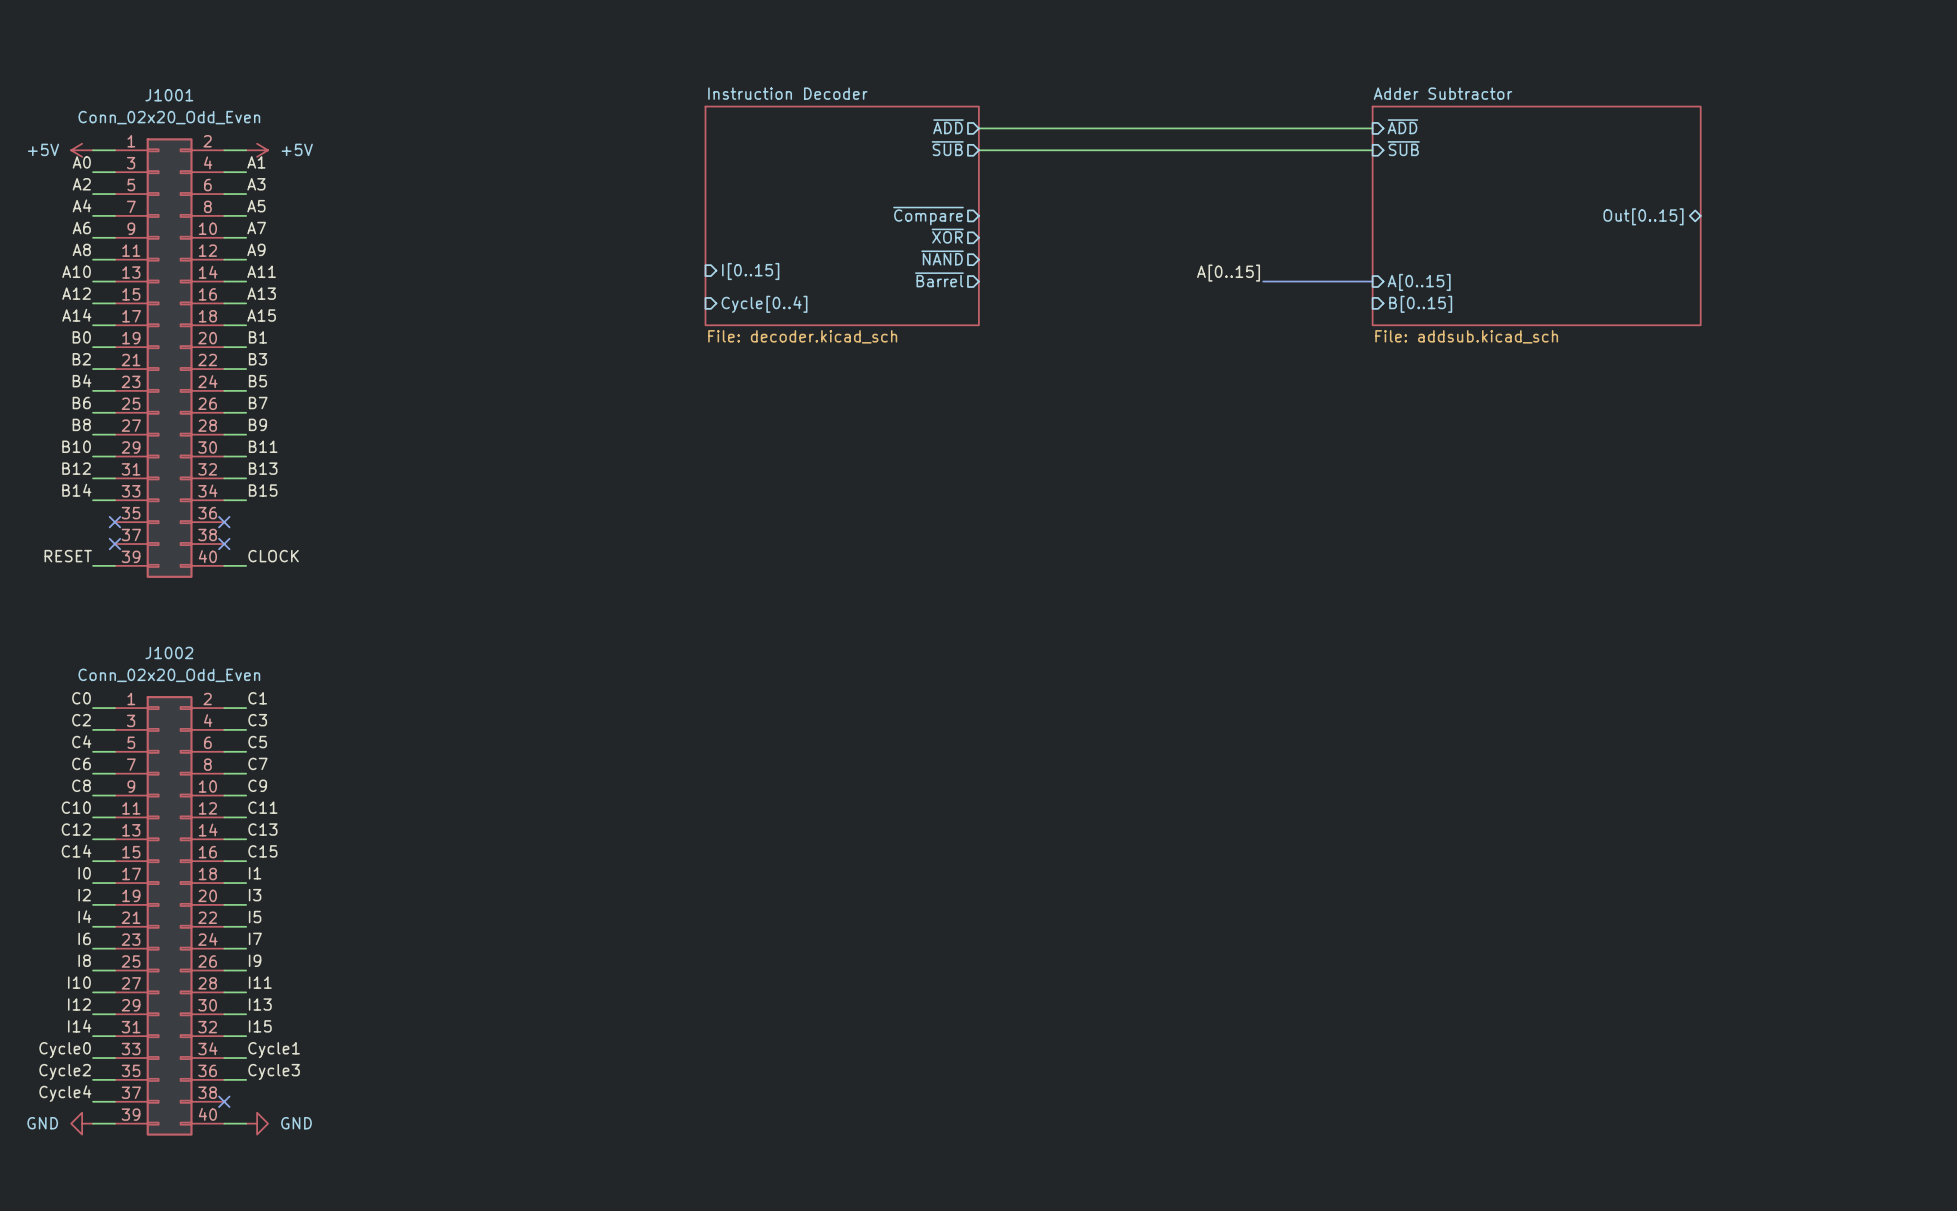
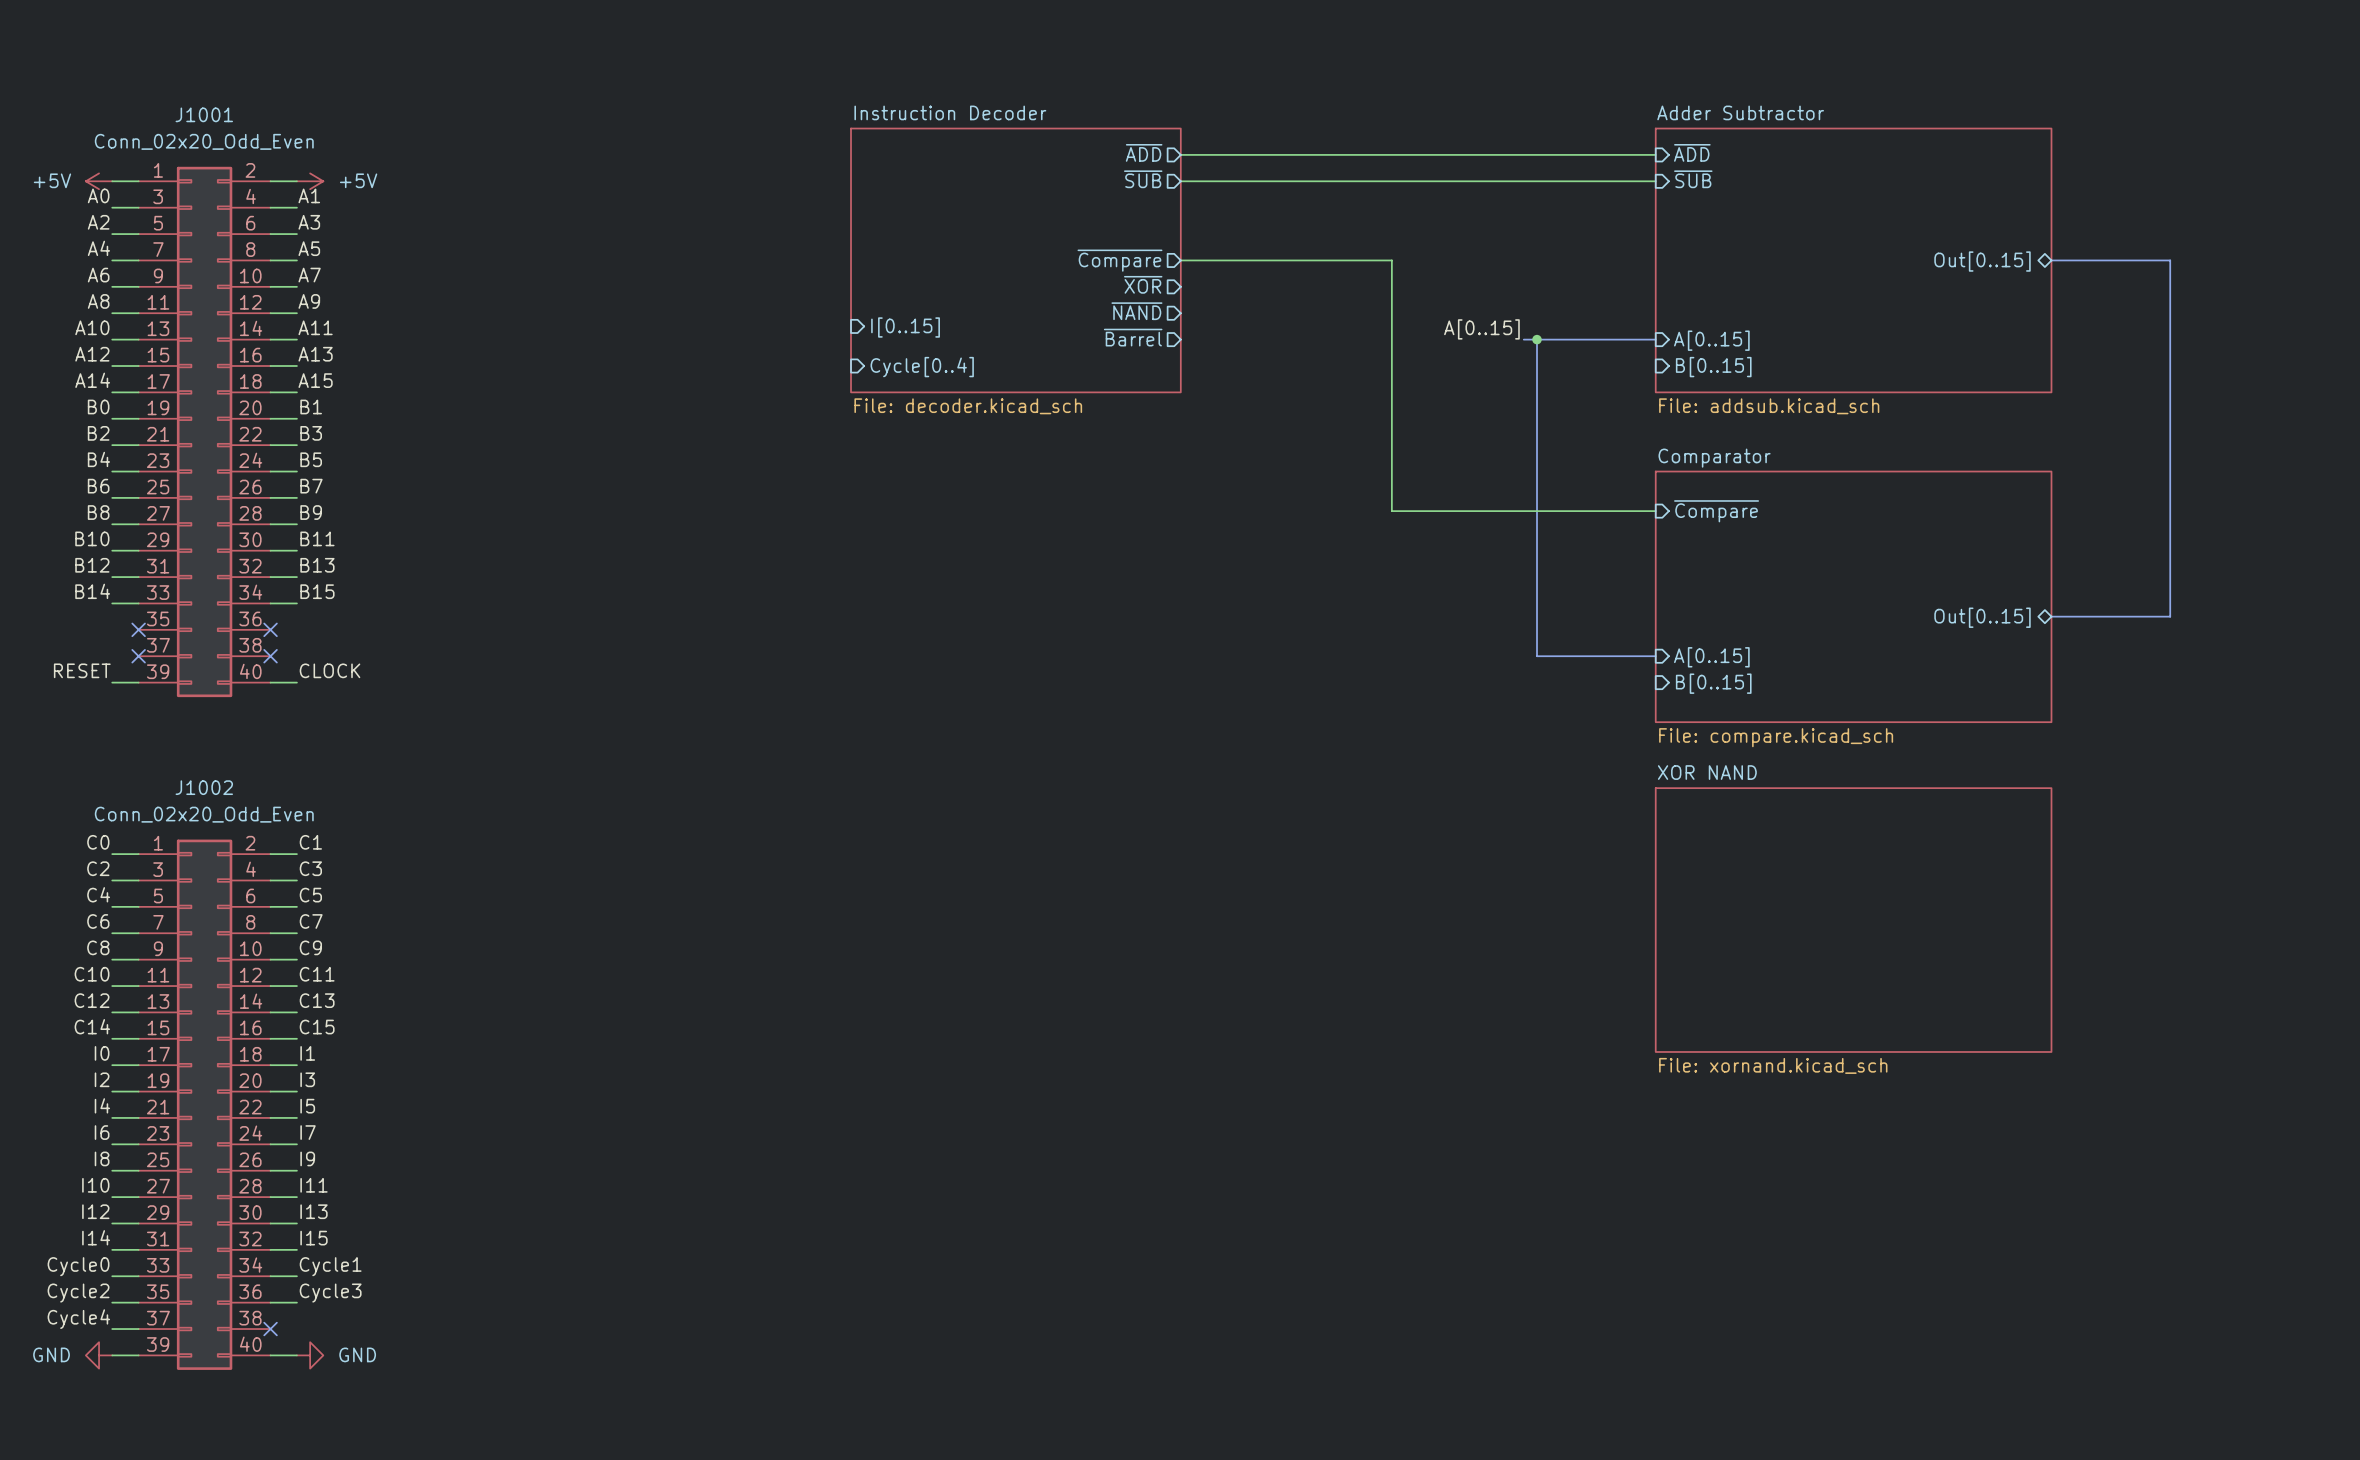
wire: none -> (1180, 260) (1391, 260) (1391, 511) (1655, 511)
bus: none -> (2051, 260) (2170, 260) (2170, 616) (2051, 616)
bus: none -> (1537, 339) (1537, 656) (1655, 656)
junction: none -> (1537, 339)
sheet pin: none -> ~{Compare} (1716, 511)
sheet Comparator: none -> File: compare.kicad_sch (1853, 596)
sheet pin: none -> Out[0..15] (1982, 617)
sheet pin: none -> A[0..15] (1711, 657)
sheet pin: none -> B[0..15] (1713, 683)
sheet XOR NAND: none -> File: xornand.kicad_sch (1853, 920)

